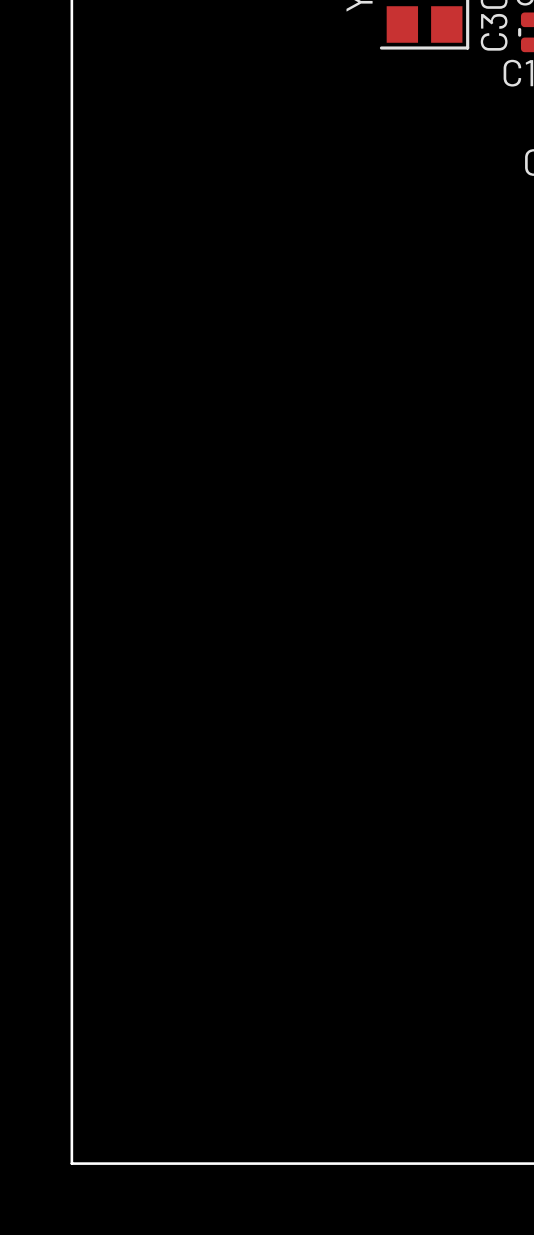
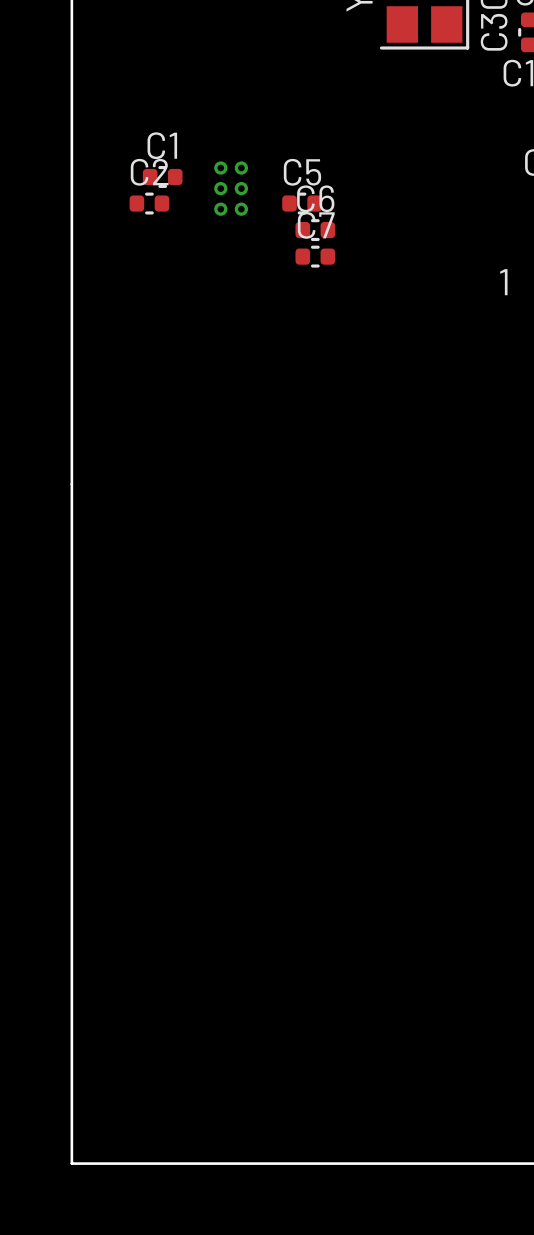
C1: none -> (162, 176)
part: none -> (231, 188)
C2: none -> (149, 203)
C5: none -> (302, 203)
C6: none -> (315, 230)
C7: none -> (315, 256)
text: none -> 1 (503, 282)

